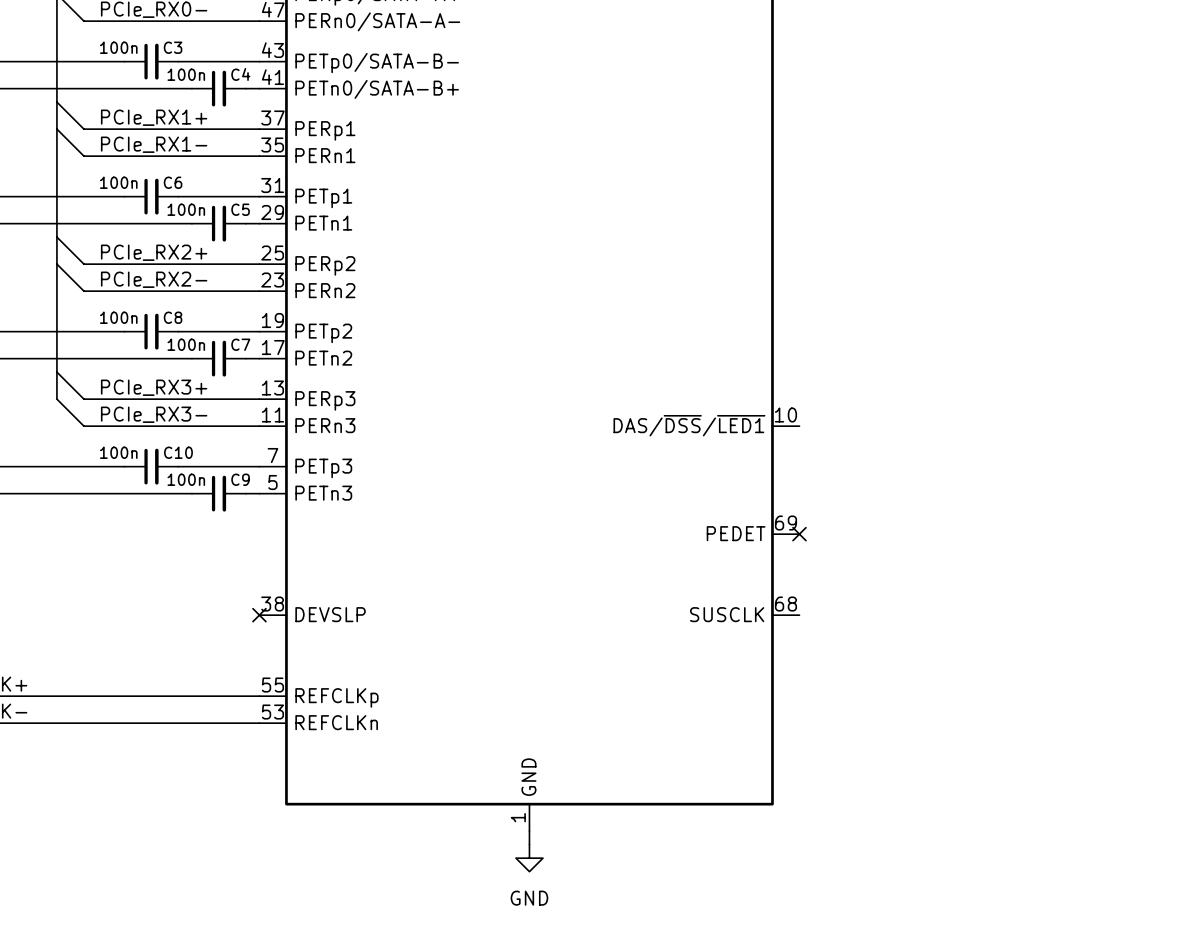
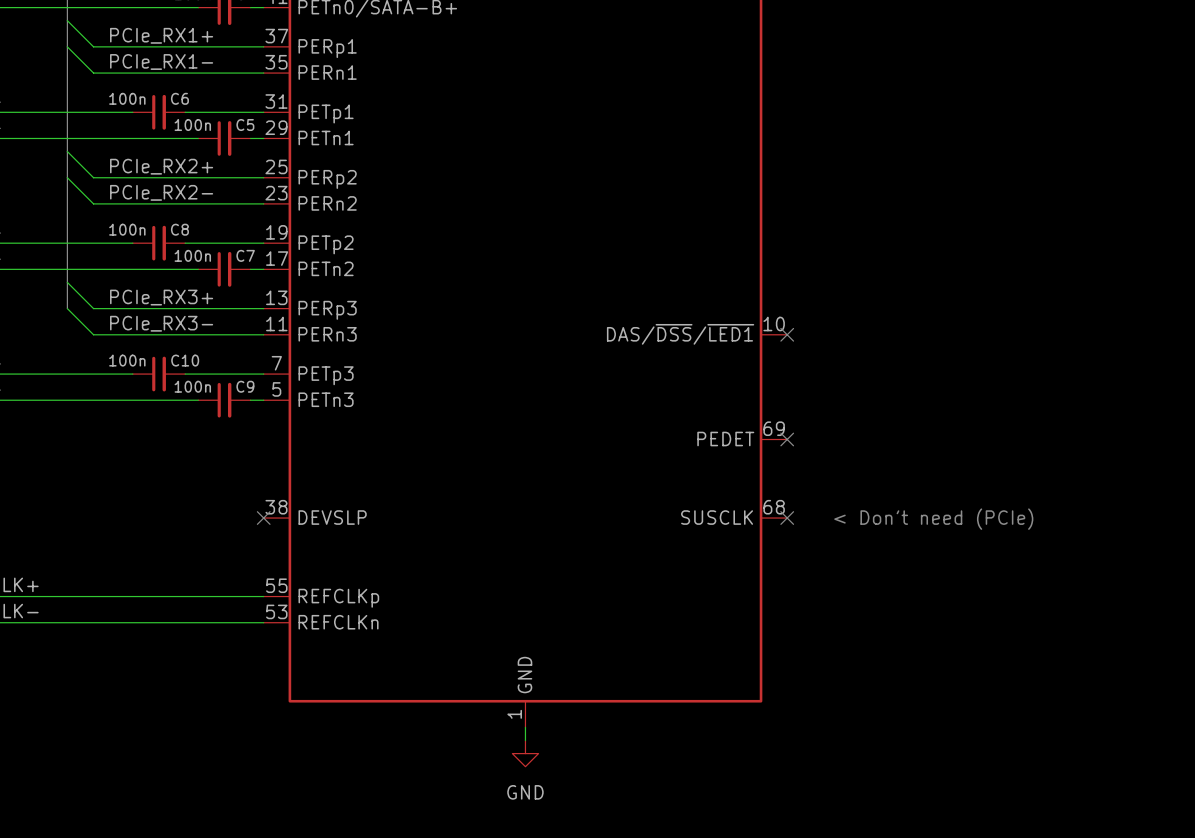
no-connect mark: none -> (787, 334)
no-connect mark: none -> (787, 518)
text: none -> < Don't need (PCIe) (933, 519)

